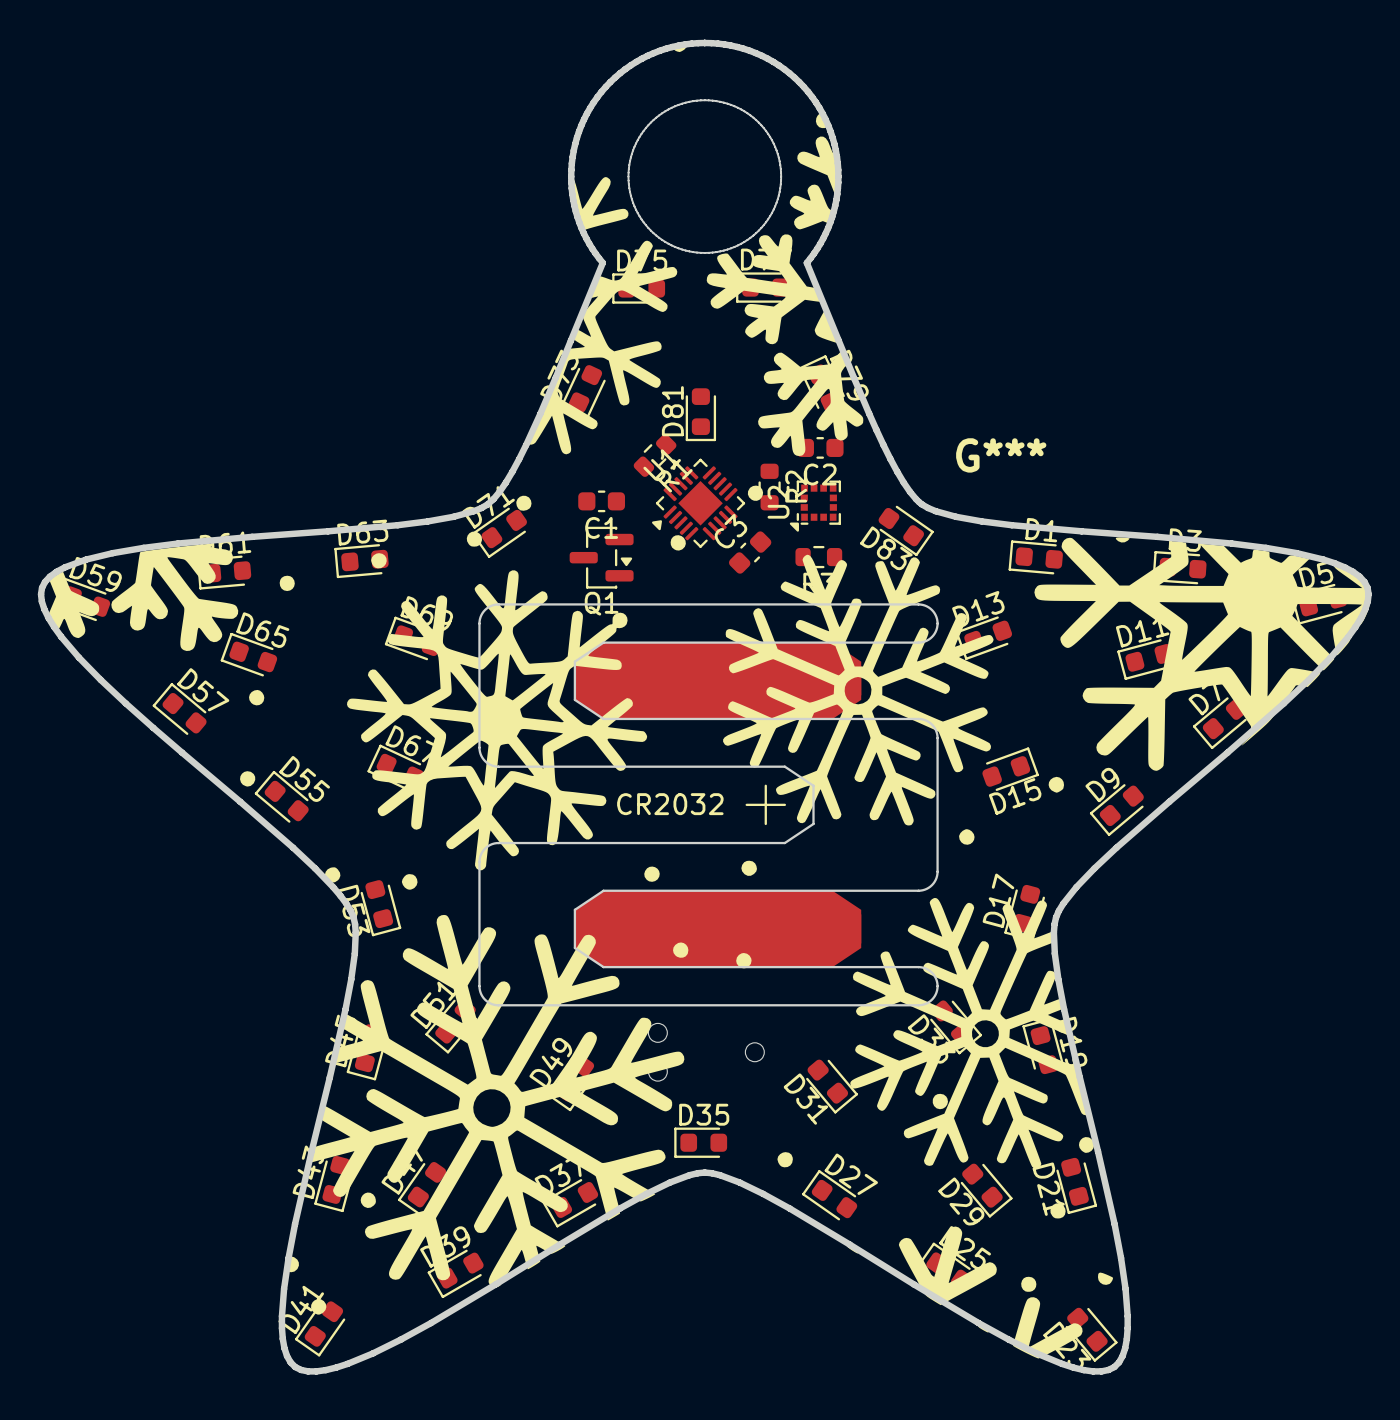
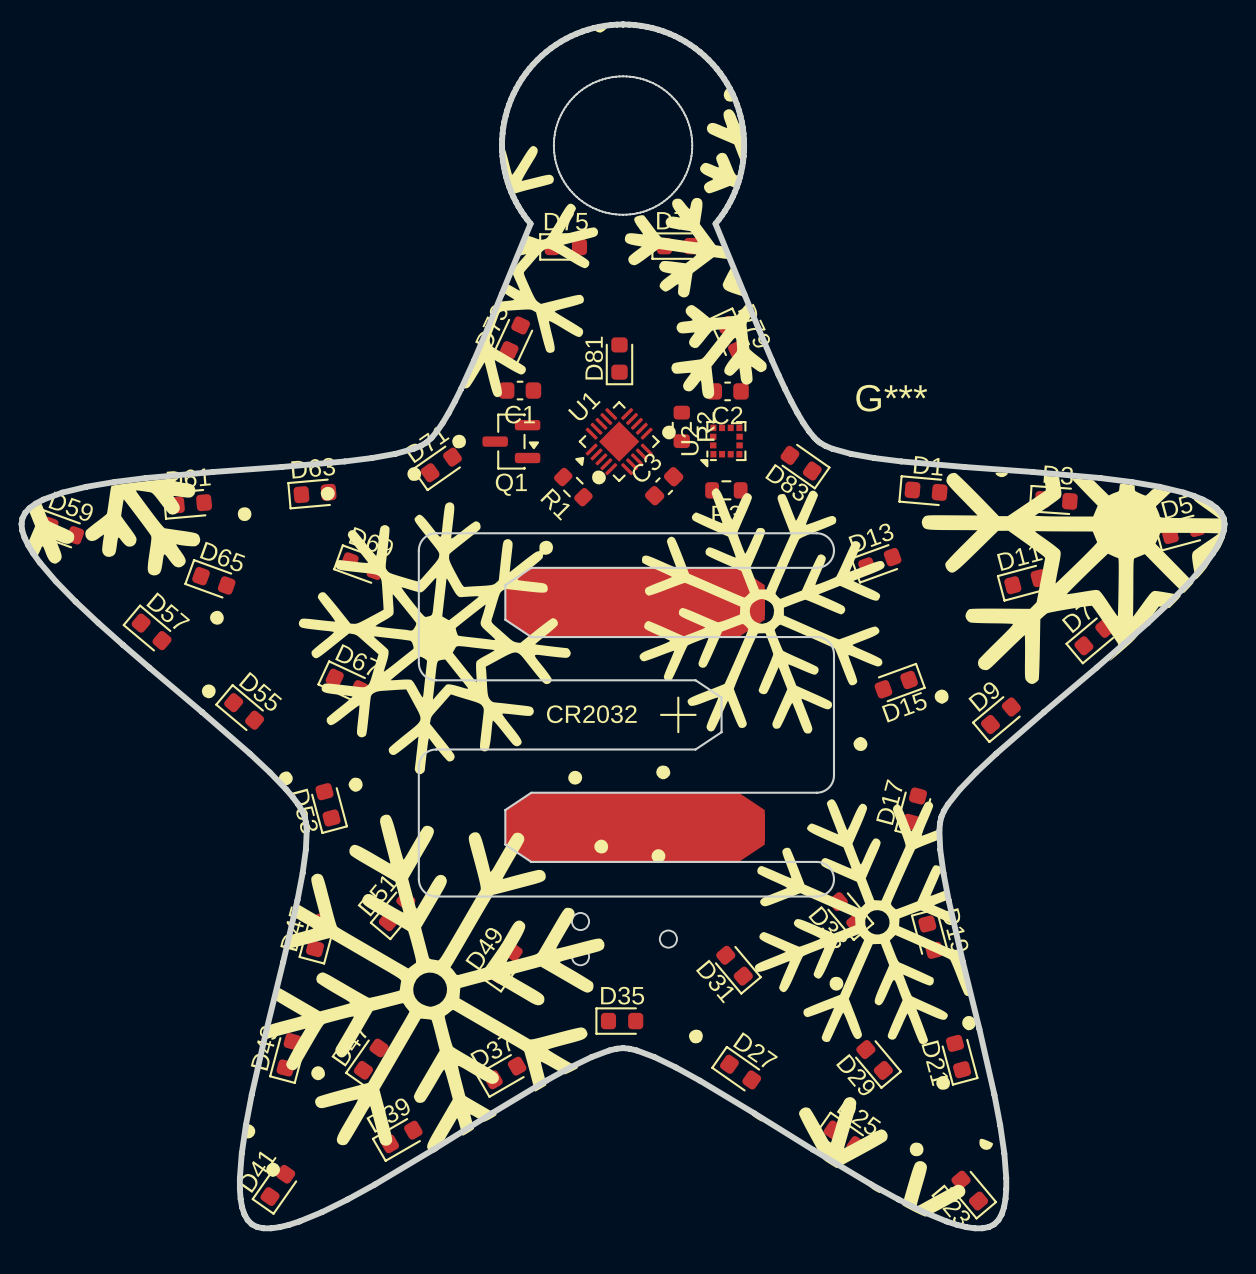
R1 rotation: 0° (655, 455) -> 90° clockwise (573, 487)
R1 position: (655, 455) -> (573, 487)
C1 position: (601, 501) -> (520, 390)
Q1 position: (601, 557) -> (511, 441)

